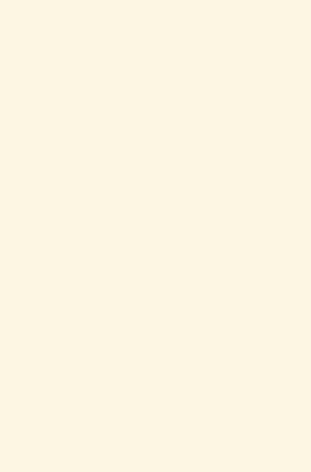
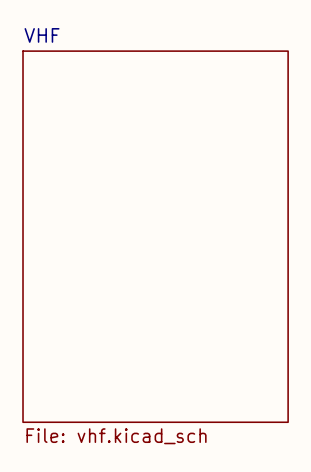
sheet VHF: none -> File: vhf.kicad_sch (155, 236)

